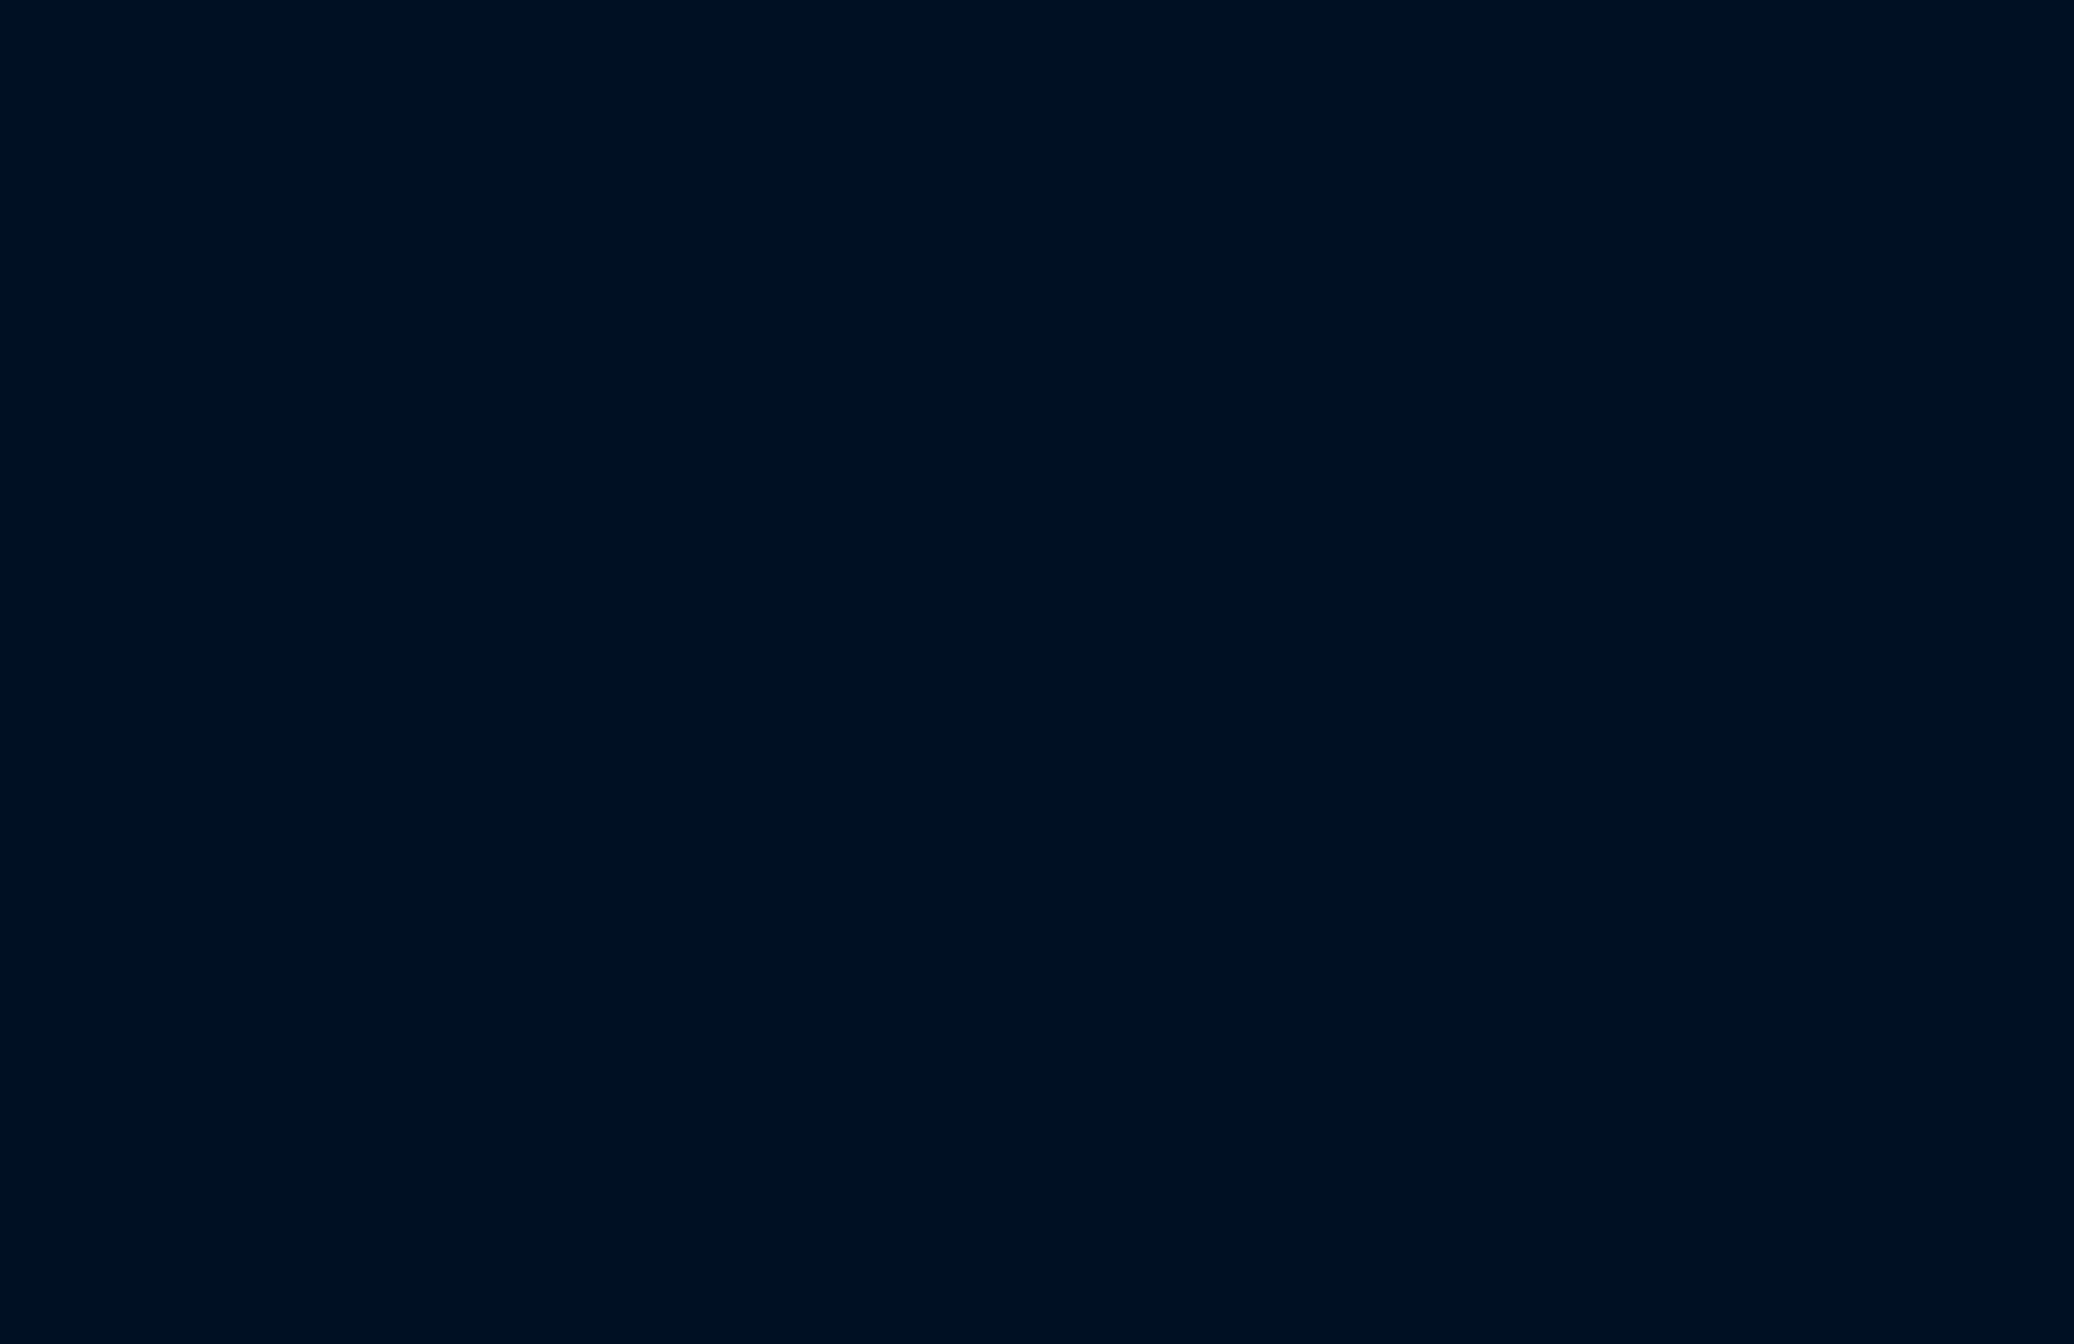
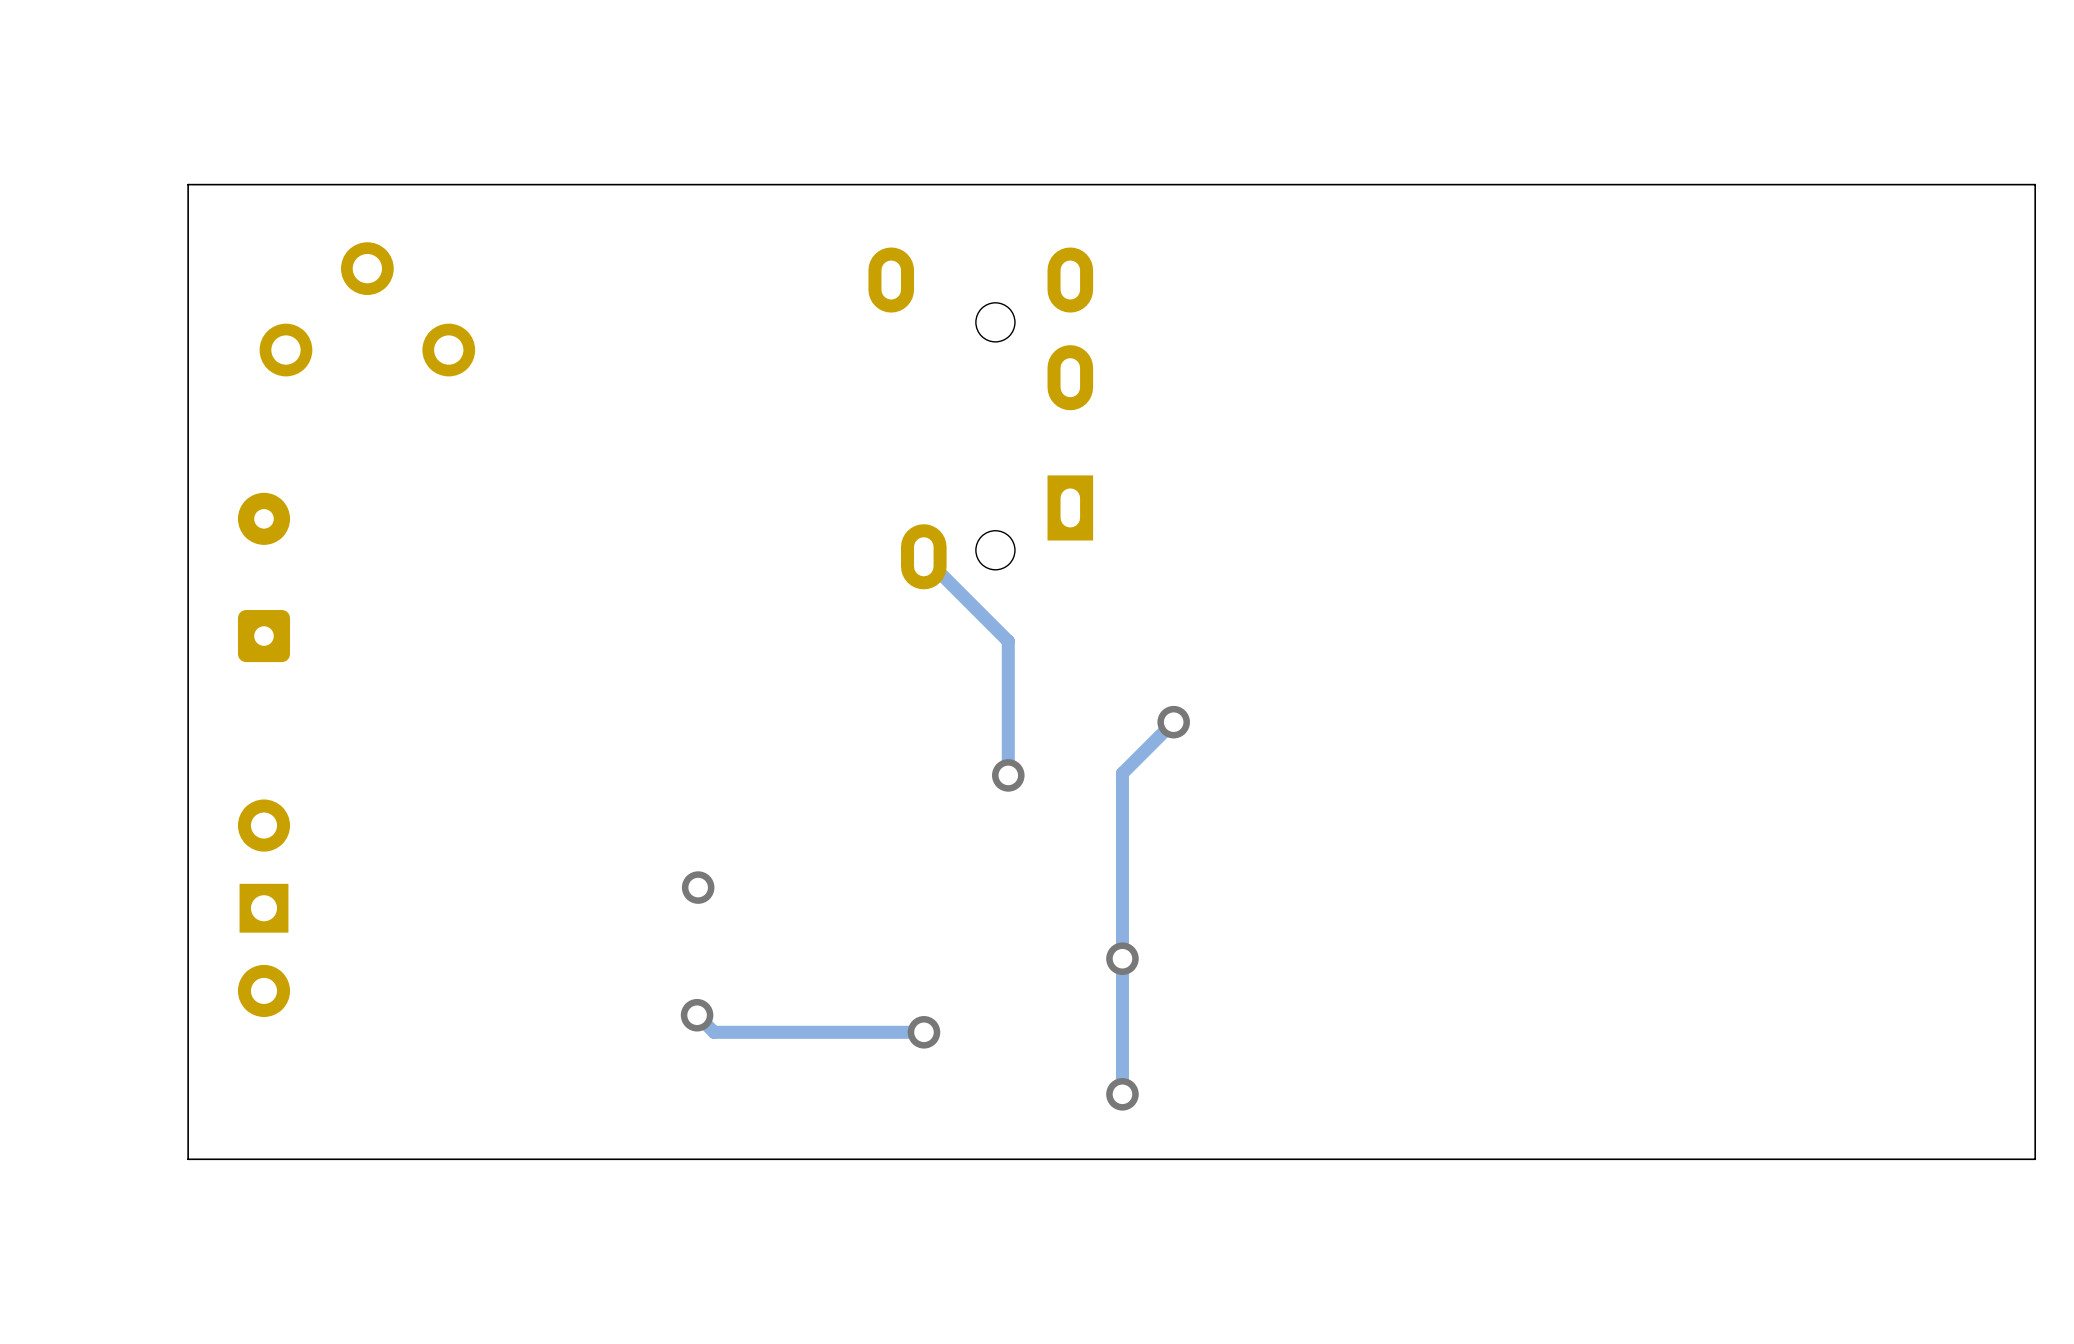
board edge: none -> (2035, 184) (188, 184) (188, 1159) (2035, 1159) (2035, 184)
part: none -> (367, 309)
part: none -> (980, 418)
track: none -> (923, 556) (1008, 641) (1008, 784)
part: none -> (263, 577)
track: none -> (1173, 722) (1122, 773) (1122, 1094)
via: none -> (1173, 722)
via: none -> (1008, 775)
via: none -> (698, 887)
part: none -> (263, 908)
via: none -> (1122, 958)
track: none -> (697, 1015) (714, 1032) (923, 1032)
via: none -> (697, 1015)
via: none -> (923, 1032)
via: none -> (1122, 1094)

